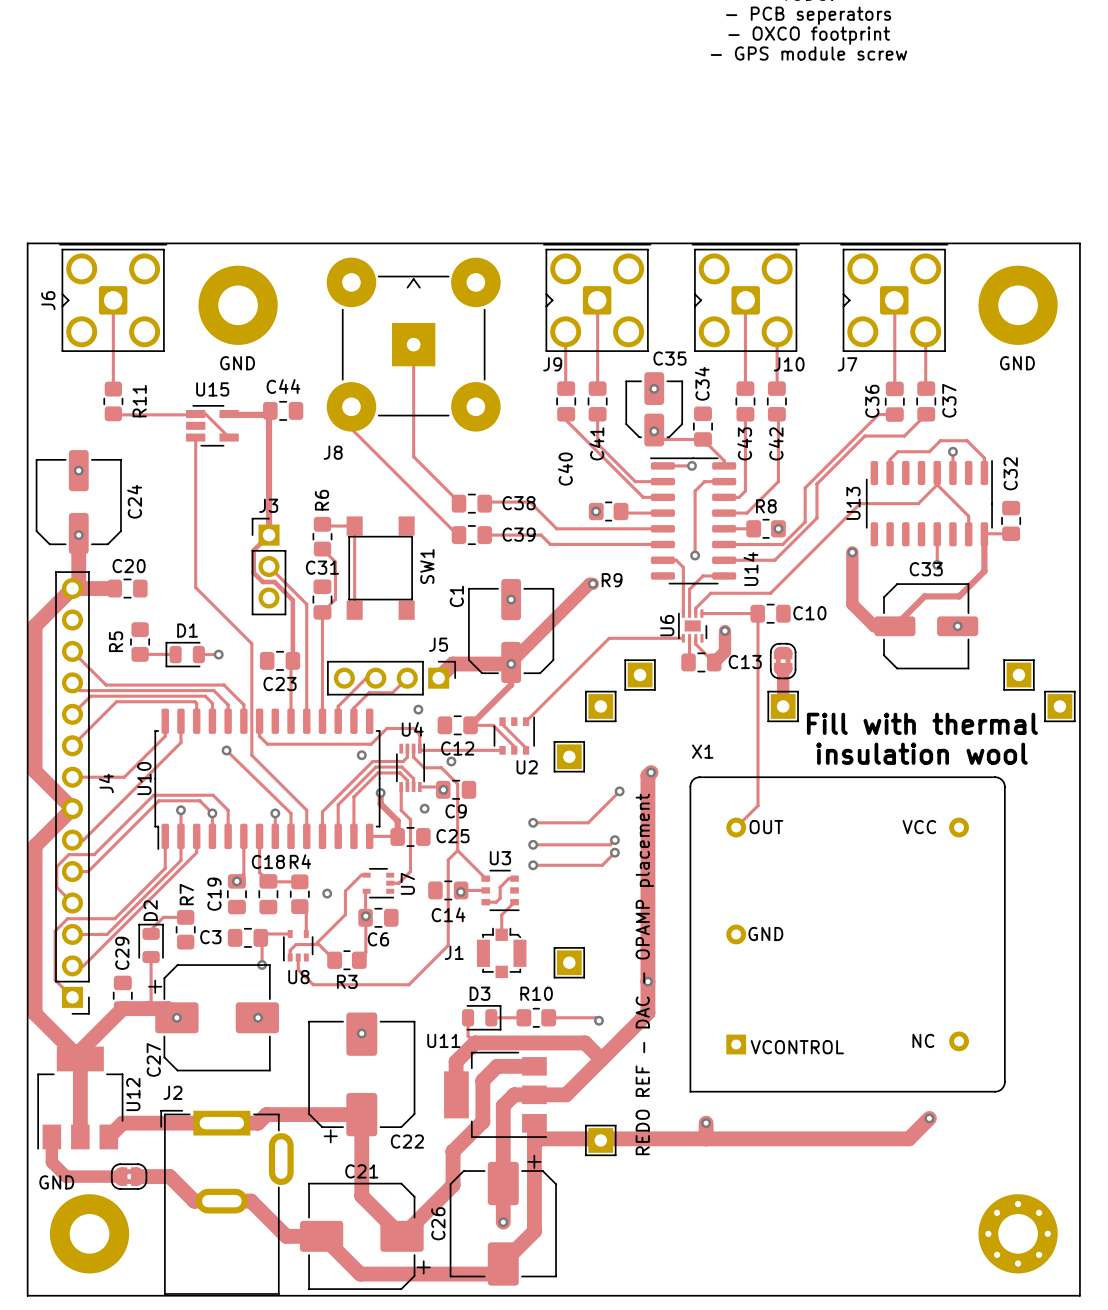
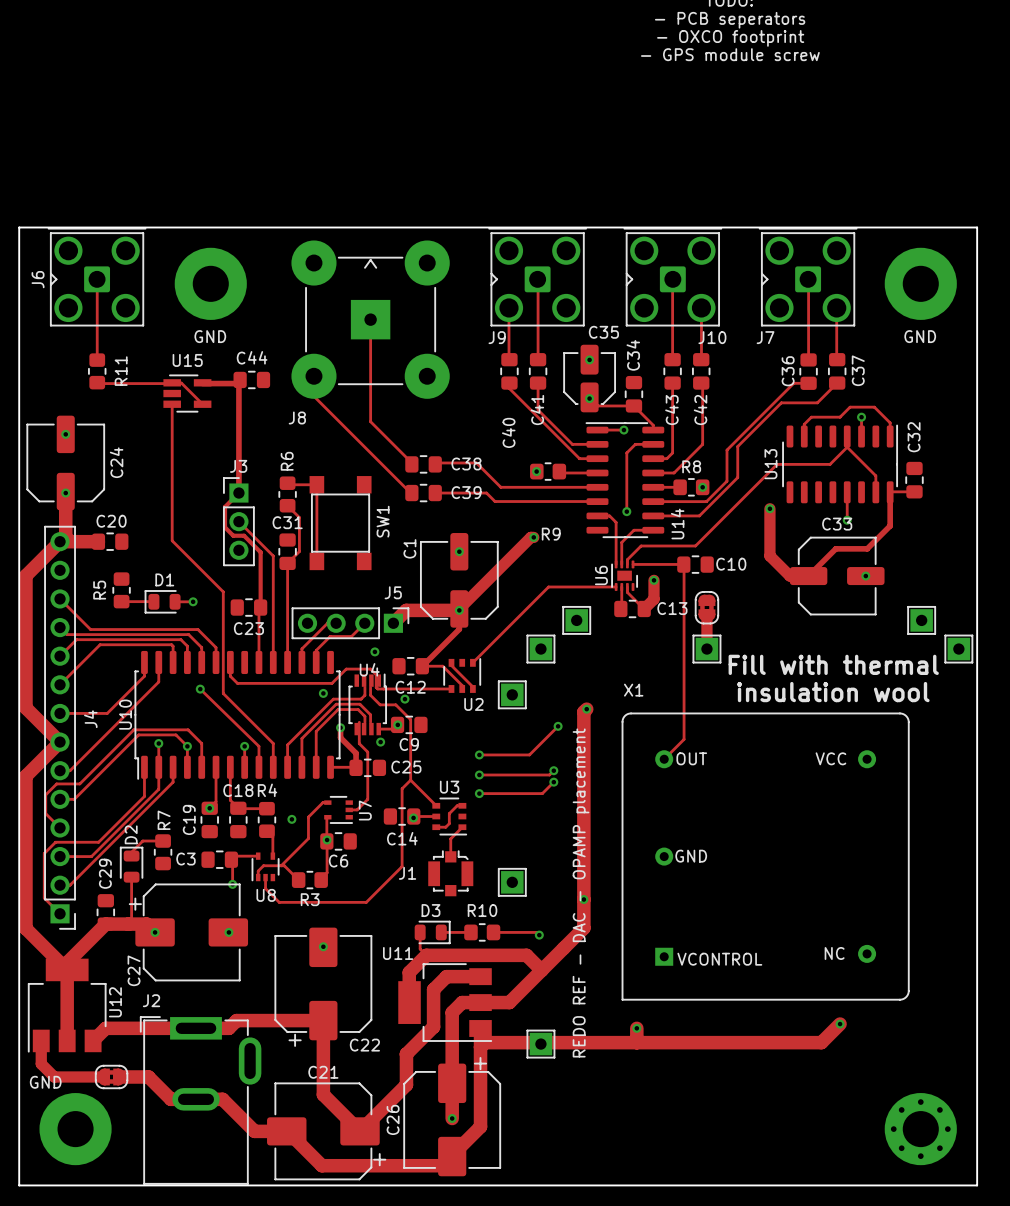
U4 footprint: [396, 743, 425, 792] -> [348, 673, 387, 736]
track: (419, 786) (440, 786) -> none
track: none -> (397, 724) (393, 729) (378, 729)

